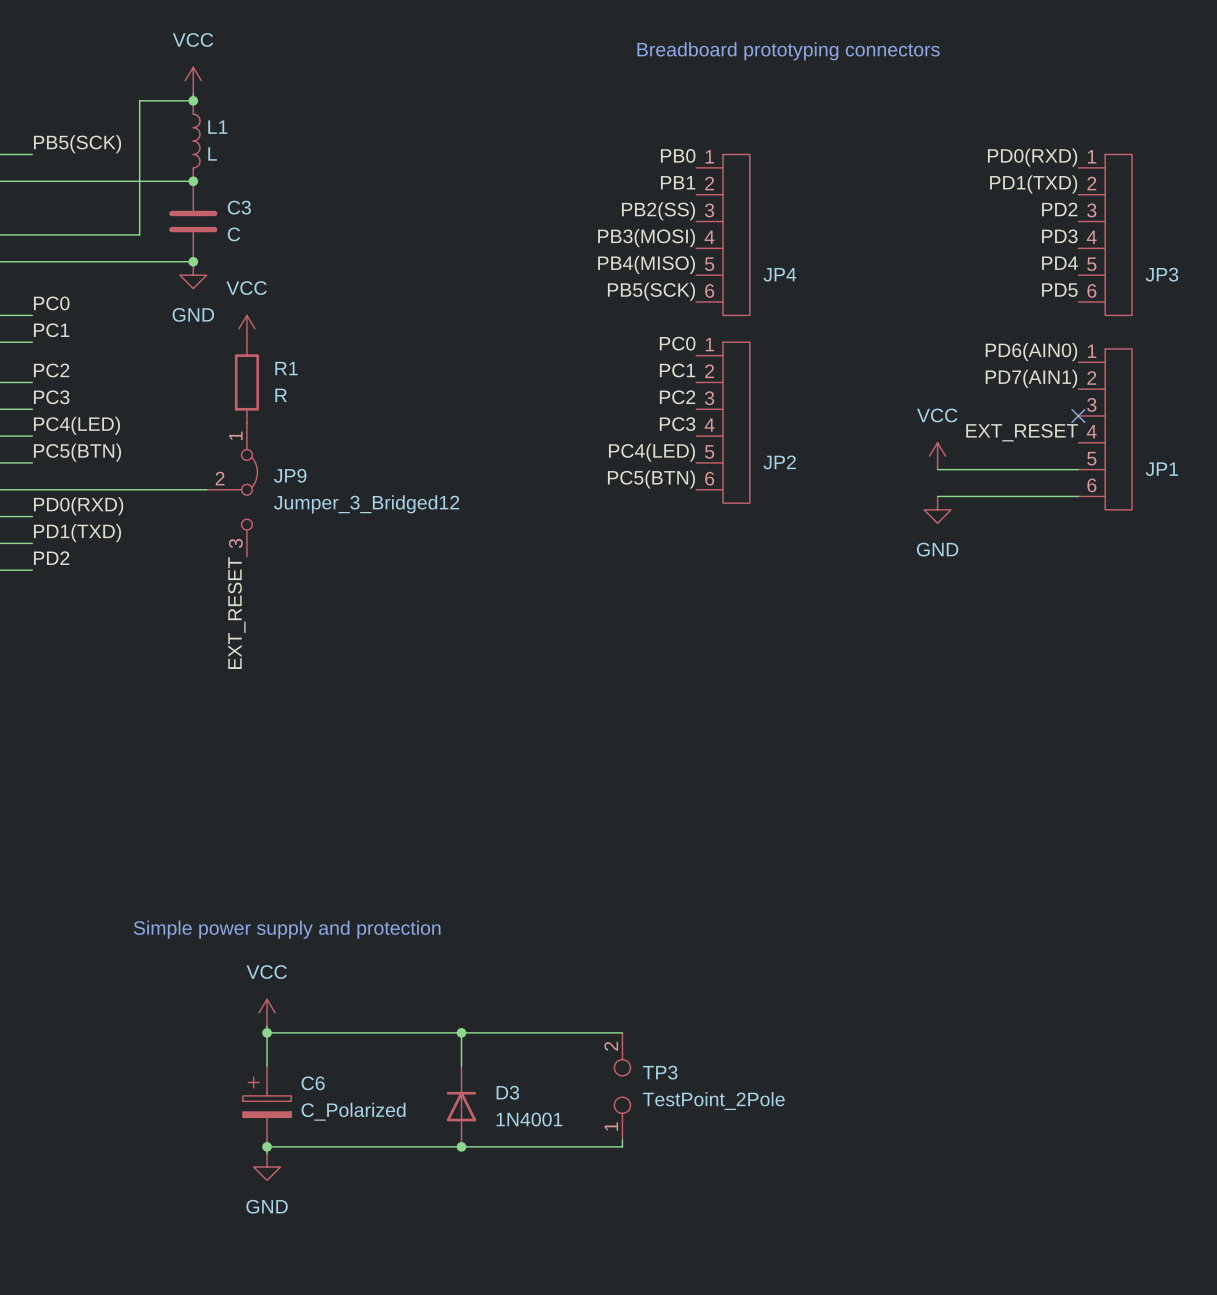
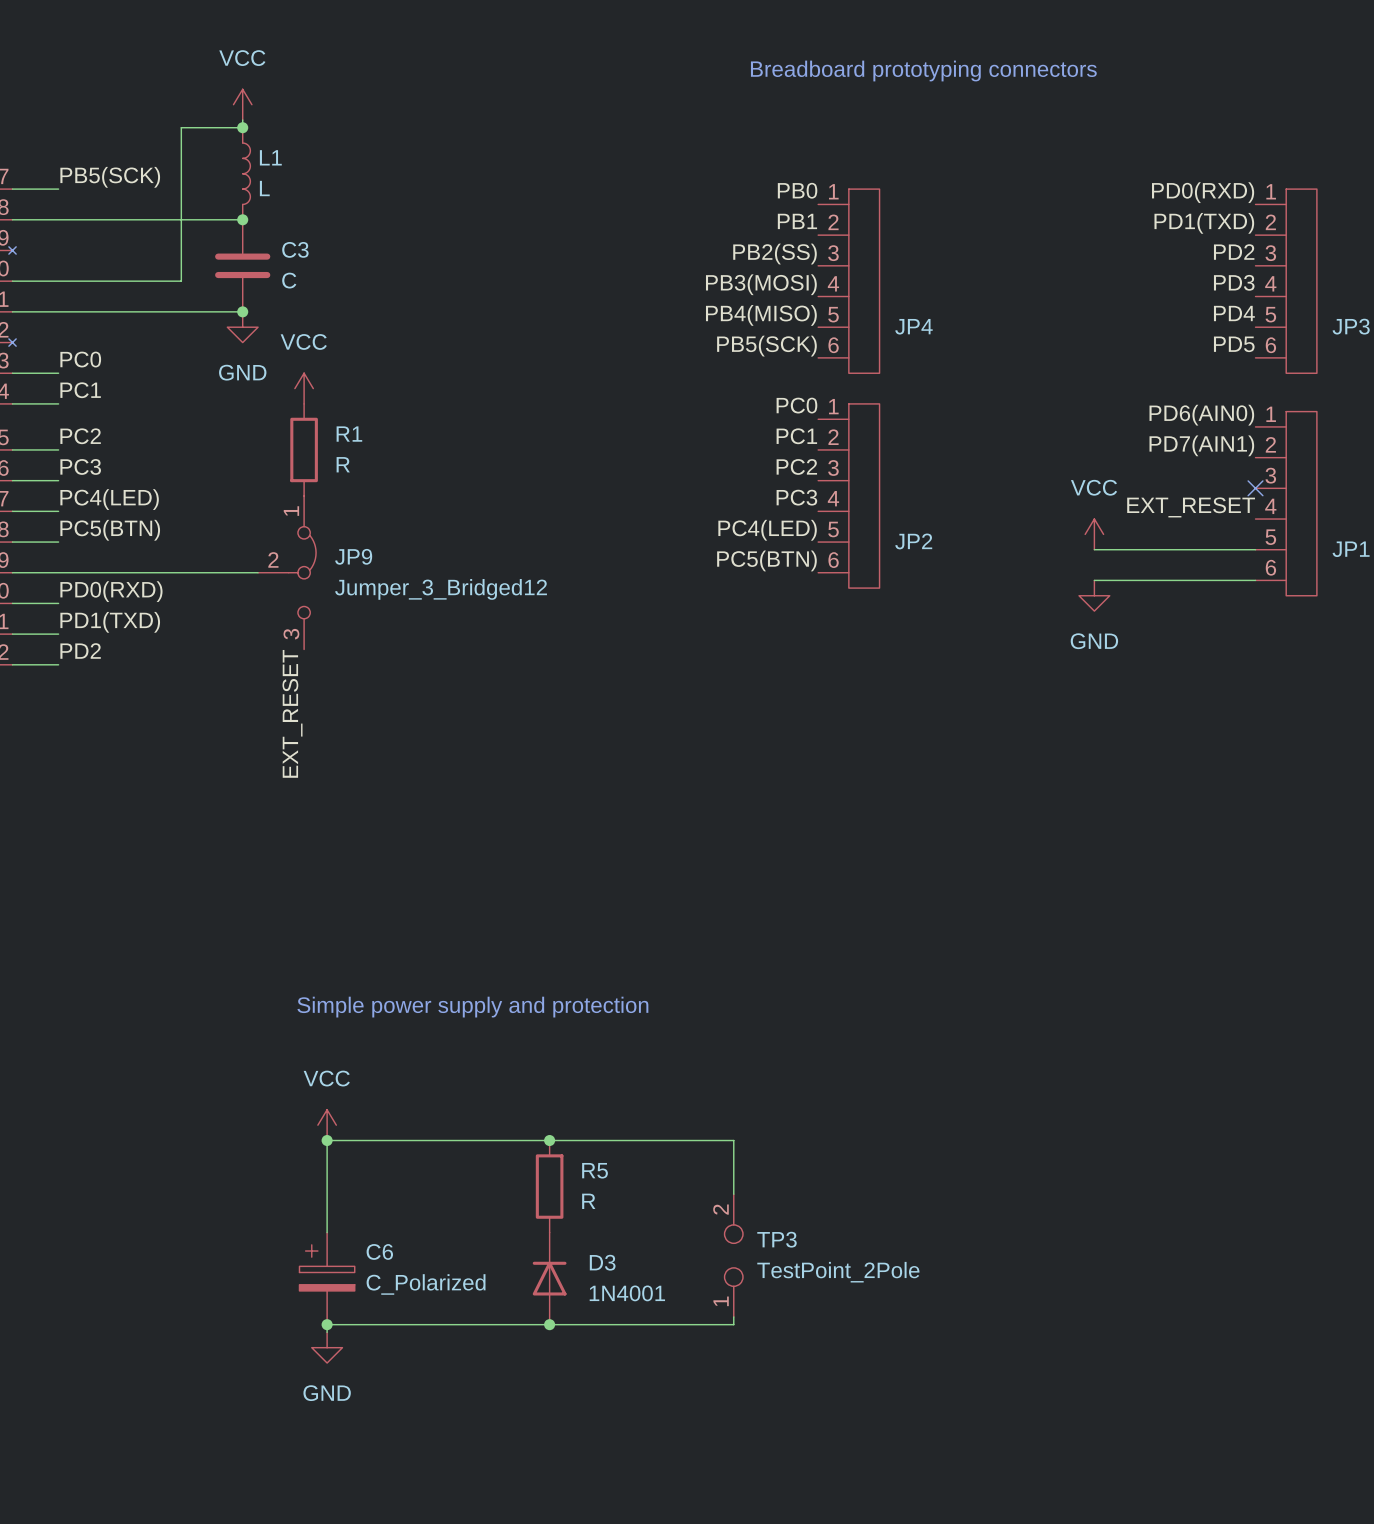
text position: Simple power supply and protection (287, 929) -> Simple power supply and protection (472, 1007)
power symbol position: VCC (267, 1012) -> VCC (327, 1125)
R5: none -> R (549, 1186)
wire: (267, 1032) (622, 1032) -> (327, 1186) (327, 1140) (733, 1140) (733, 1194)
junction position: (267, 1032) -> (327, 1140)
wire: (461, 1032) (461, 1066) -> none
junction position: (461, 1032) -> (549, 1140)

